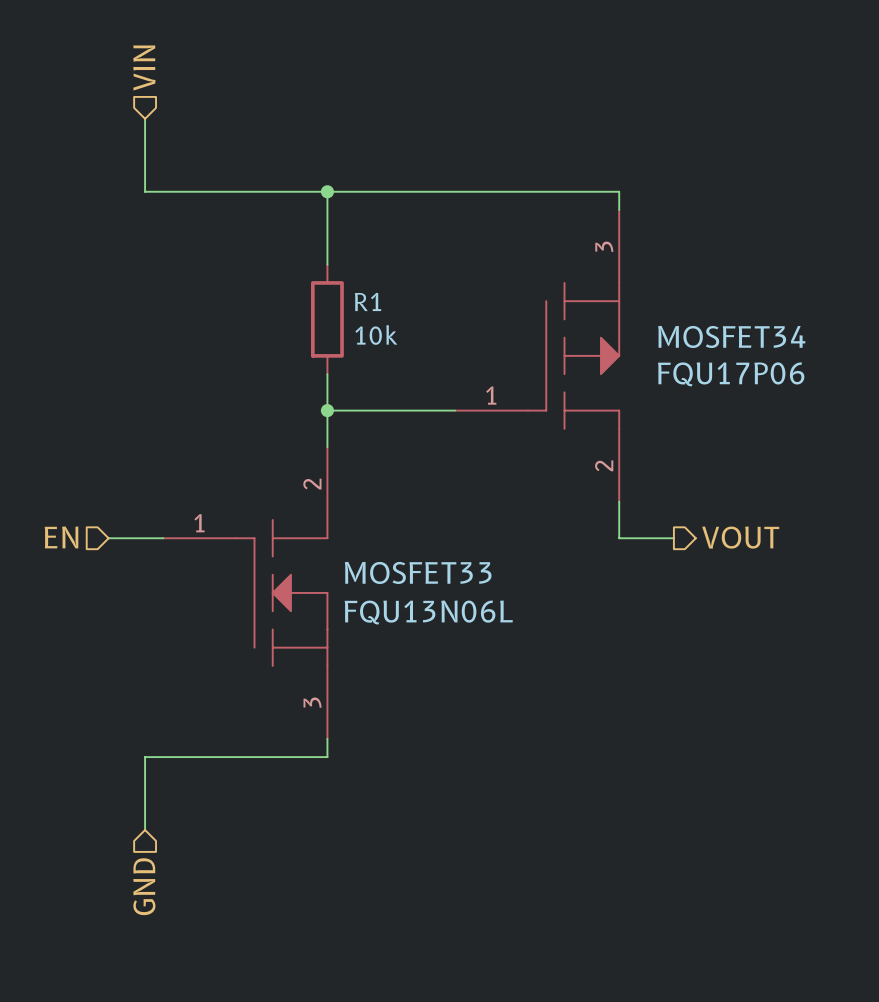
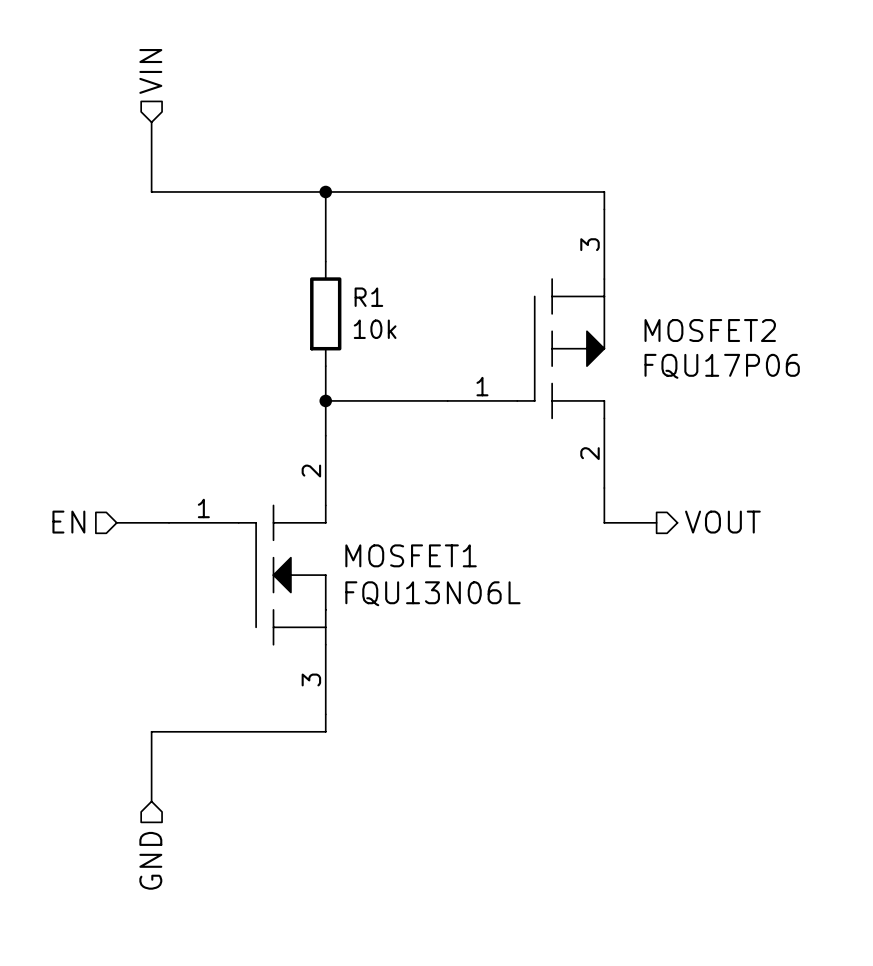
MOSFET34 name: MOSFET34 (731, 336) -> MOSFET2 (710, 330)
MOSFET33 name: MOSFET33 (418, 572) -> MOSFET1 (411, 555)

